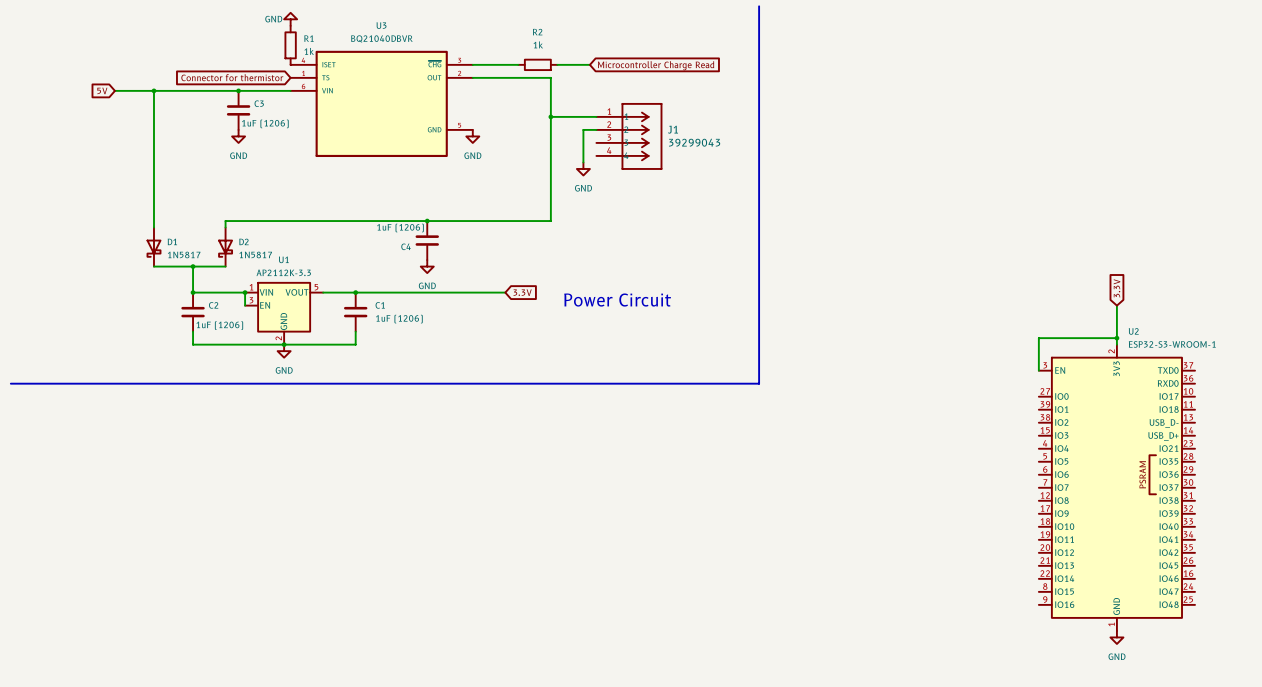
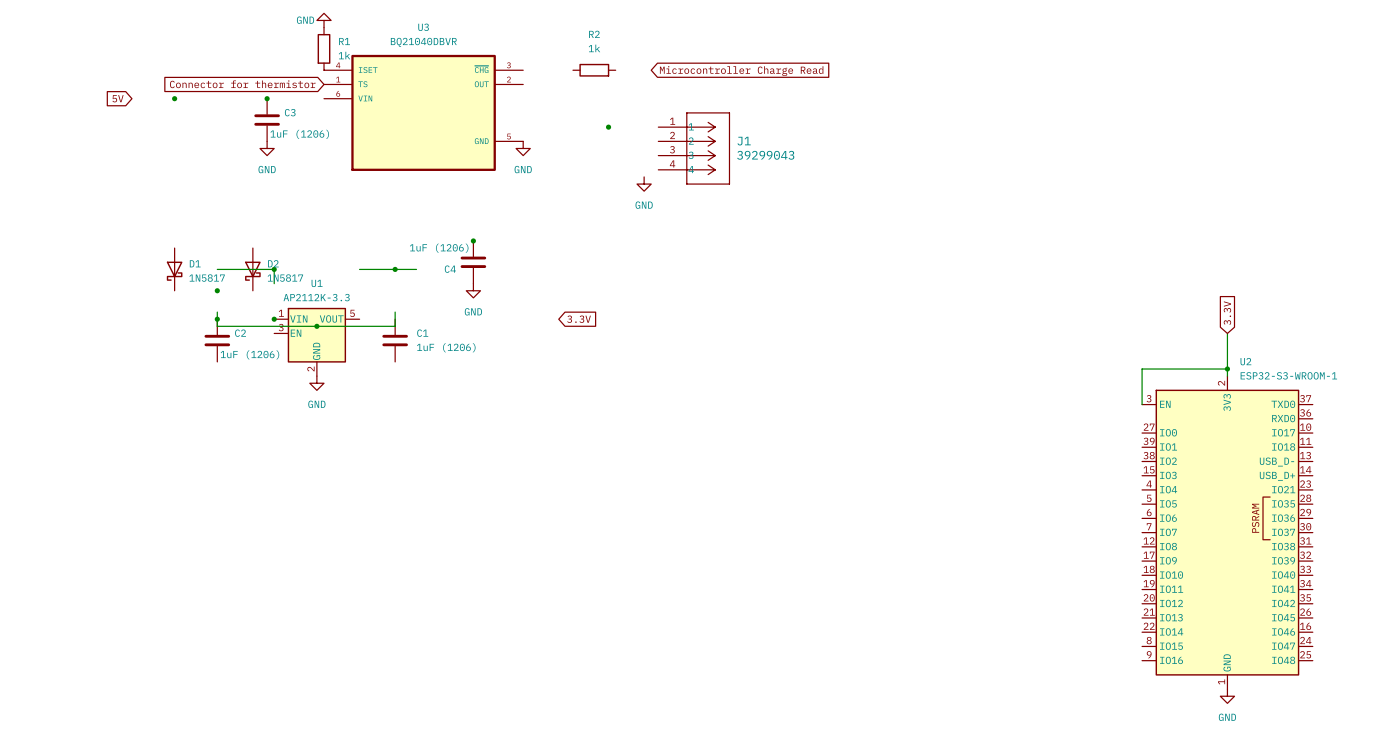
line: (759, 6) (759, 383) (10, 383) -> none
wire: (472, 64) (518, 64) -> none
wire: (557, 64) (589, 64) -> none
wire: (472, 77) (550, 77) (550, 221) (225, 221) (225, 227) -> none
wire: (114, 90) (290, 90) -> none
wire: (153, 90) (153, 227) -> none
wire: (550, 116) (596, 116) -> none
wire: (596, 129) (583, 129) (583, 162) -> none
wire: none -> (217, 269) (274, 269) (274, 283)
junction: none -> (274, 269)
wire: none -> (359, 269) (416, 269)
junction: none -> (395, 269)
wire: (153, 266) (225, 266) -> none
wire: (193, 266) (193, 286) -> none
wire: (193, 292) (245, 292) (245, 305) -> (217, 319) (217, 326) (395, 326) (395, 312)
wire: (323, 292) (505, 292) -> none
junction: (355, 292) -> none
junction: none -> (316, 326)
text: Power Circuit (617, 300) -> none
wire: (193, 331) (193, 344) (355, 344) (355, 331) -> none
junction: (284, 344) -> none

